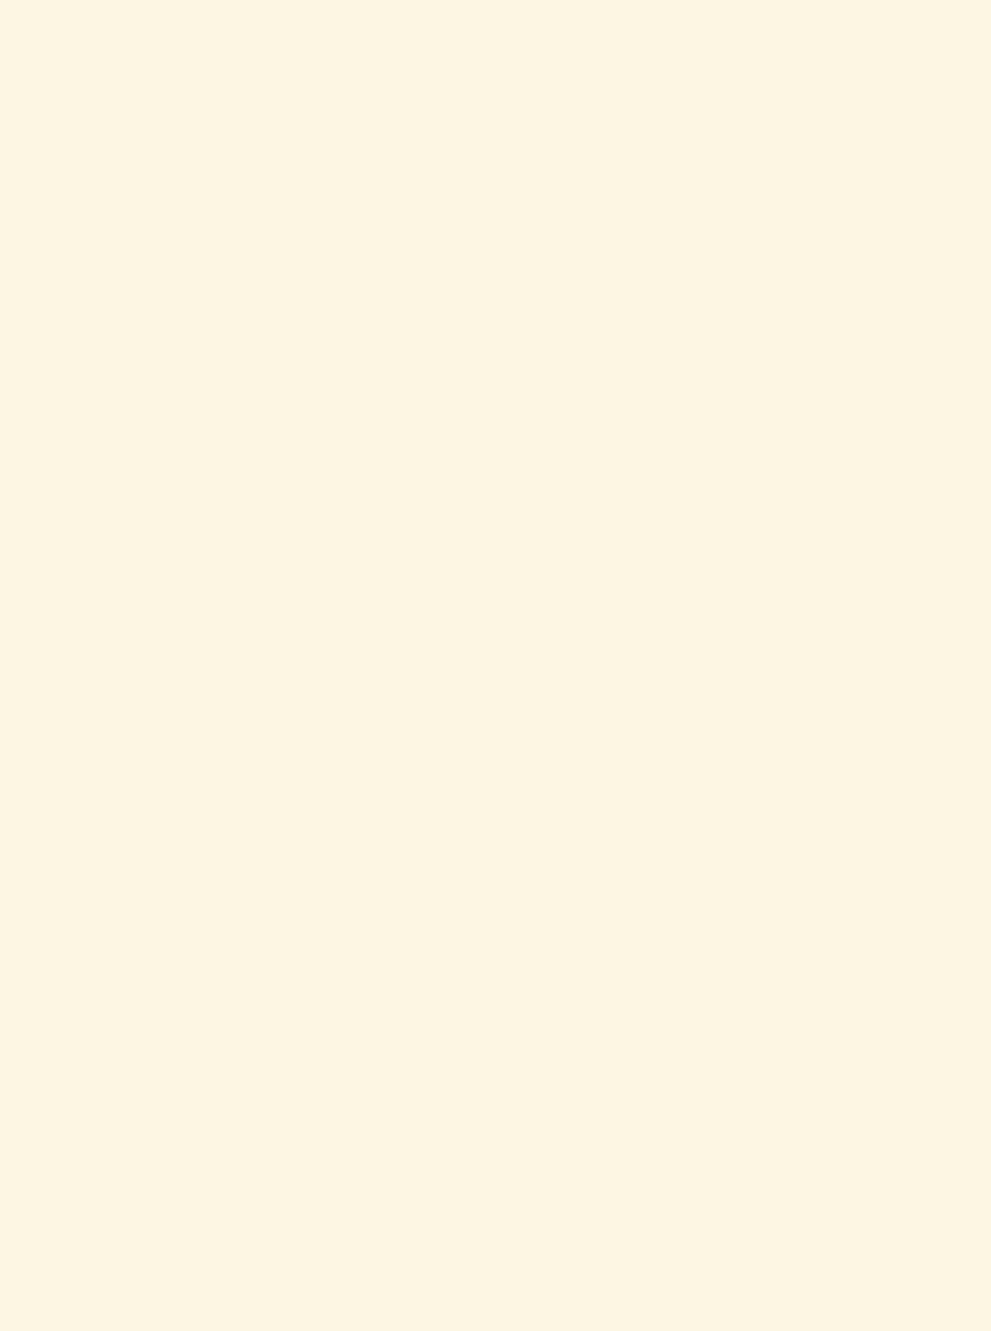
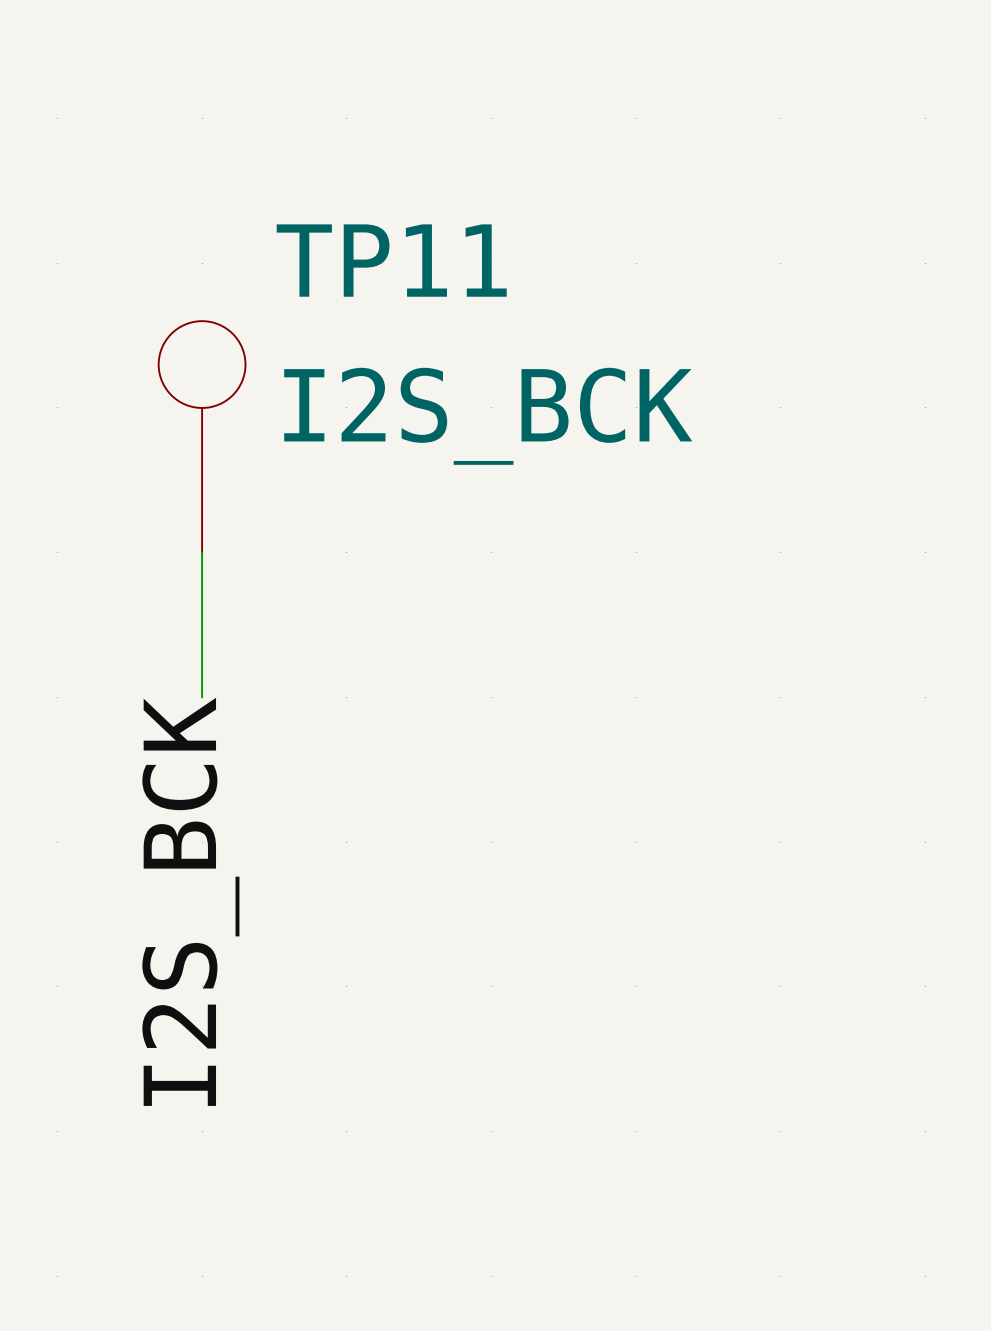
TP11: none -> I2S_BCK (202, 436)
wire: none -> (202, 552) (202, 697)
label: none -> I2S_BCK (190, 901)

